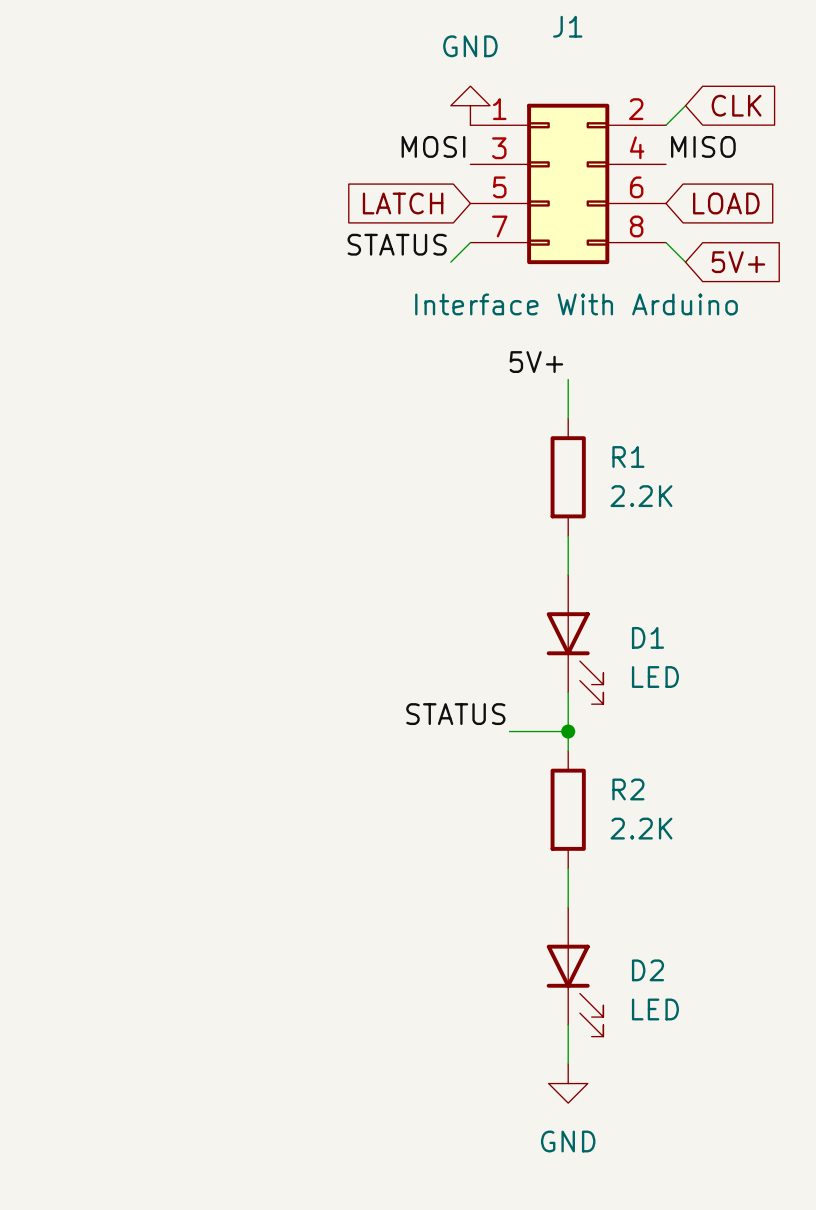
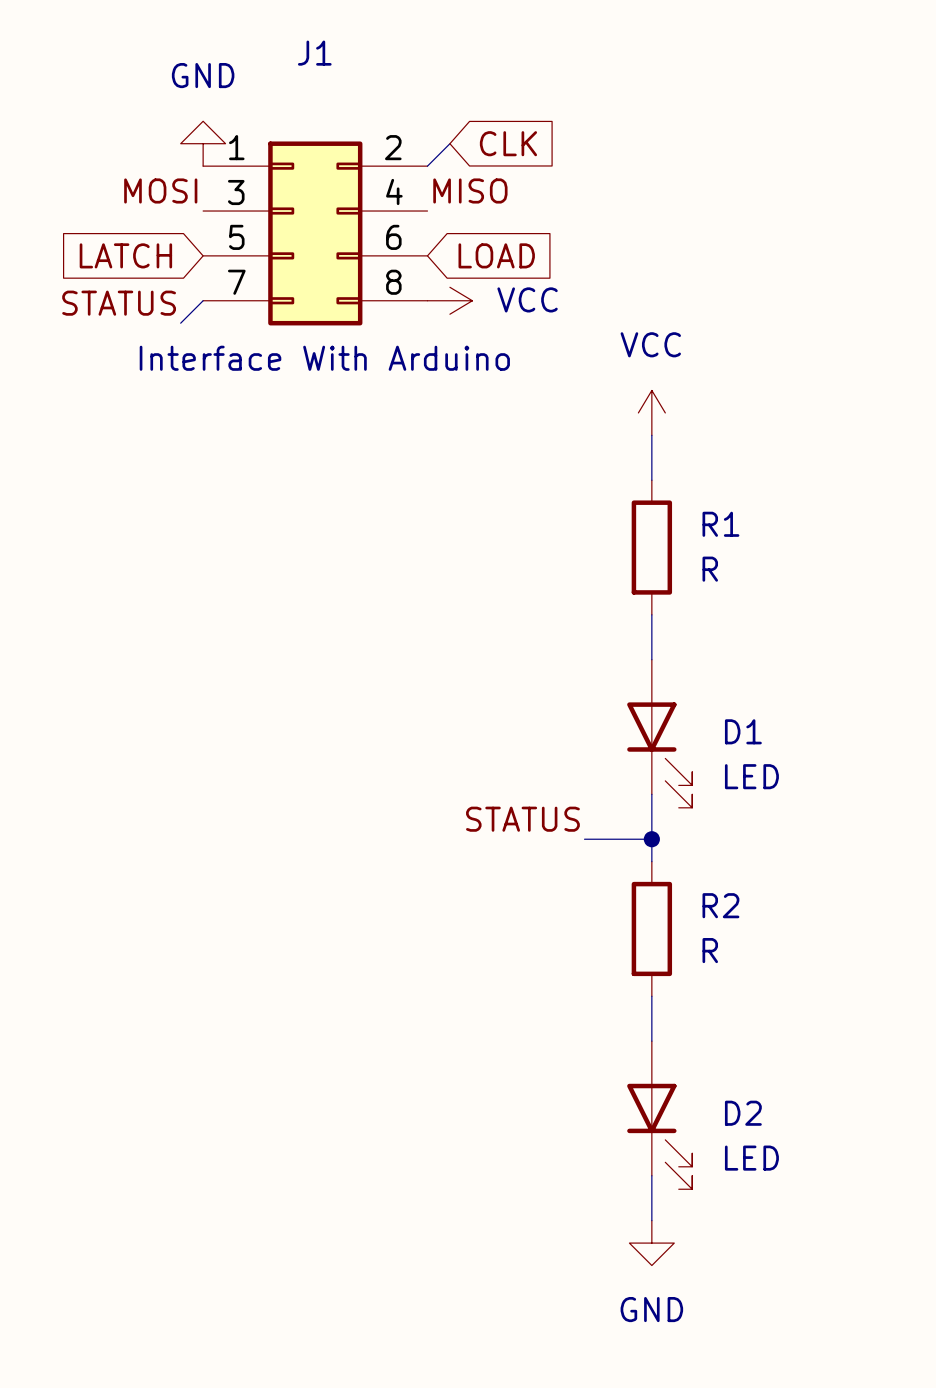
power symbol position: GND (470, 105) -> GND (203, 143)
wire: (685, 105) (665, 125) -> (449, 143) (427, 166)
global label position: CLK (736, 105) -> CLK (508, 143)
label position: MOSI (433, 146) -> MOSI (160, 190)
label position: MISO (703, 146) -> MISO (470, 190)
J1 position: (568, 183) -> (315, 233)
global label position: LATCH (403, 203) -> LATCH (125, 255)
global label position: LOAD (726, 203) -> LOAD (496, 255)
wire: (470, 242) (450, 262) -> (203, 300) (180, 323)
wire: (665, 242) (685, 262) -> none
label position: STATUS (397, 244) -> STATUS (119, 303)
power symbol: none -> VCC (449, 300)
global label: 5V+ (738, 262) -> none
J1 value position: Interface With Arduino (576, 304) -> Interface With Arduino (324, 358)
power symbol: none -> VCC (651, 412)
label: 5V+ (536, 362) -> none
R1 value: 2.2K (641, 496) -> R (710, 569)
R2 value: 2.2K (641, 828) -> R (710, 950)

